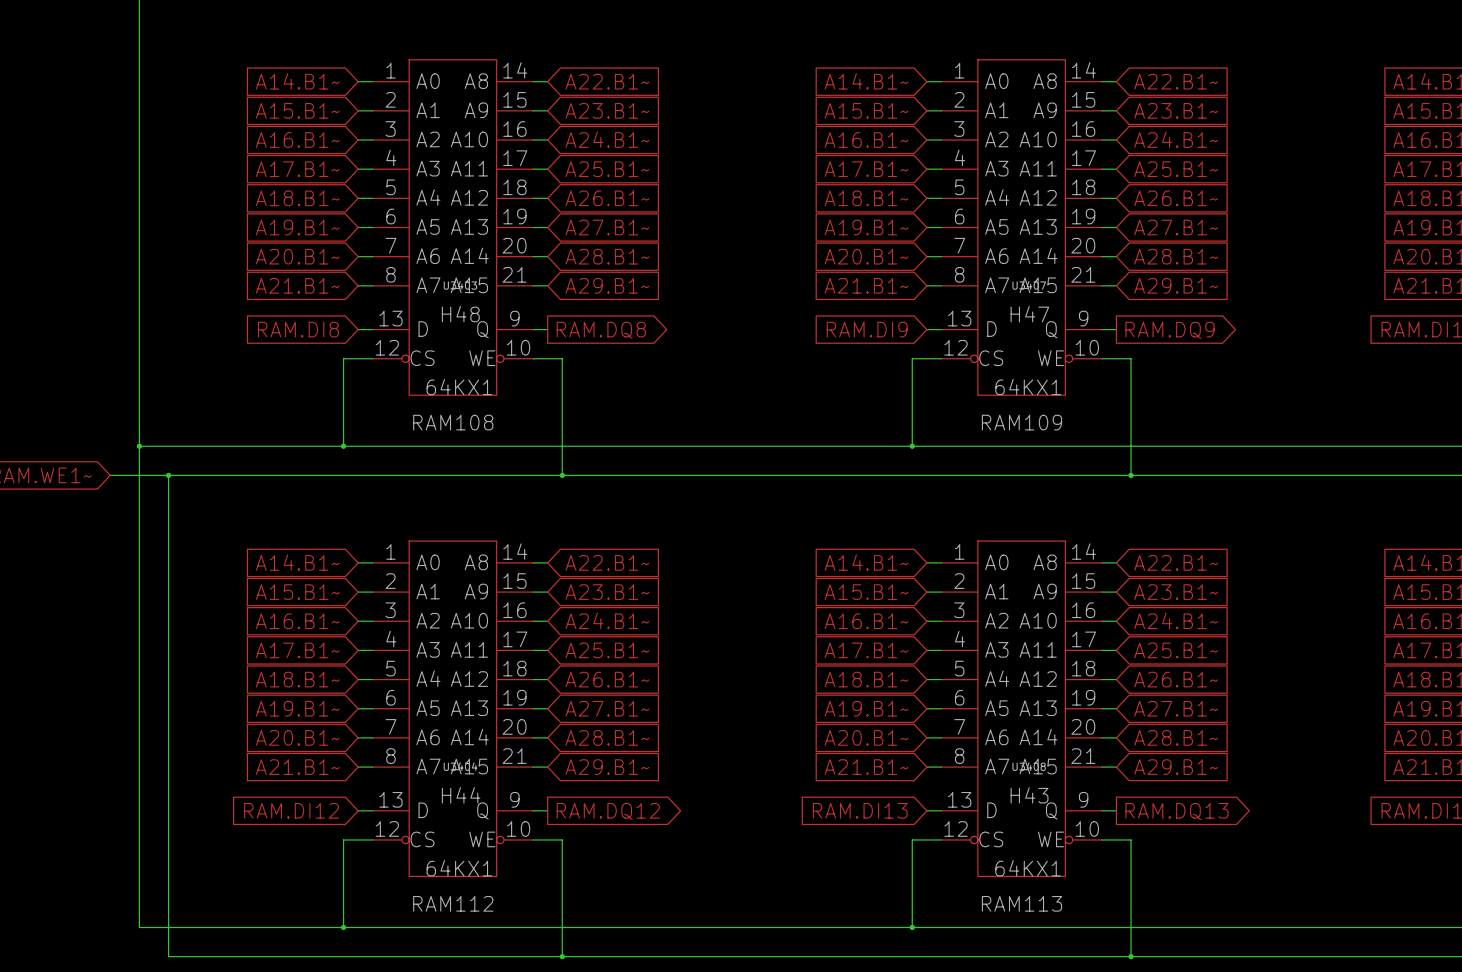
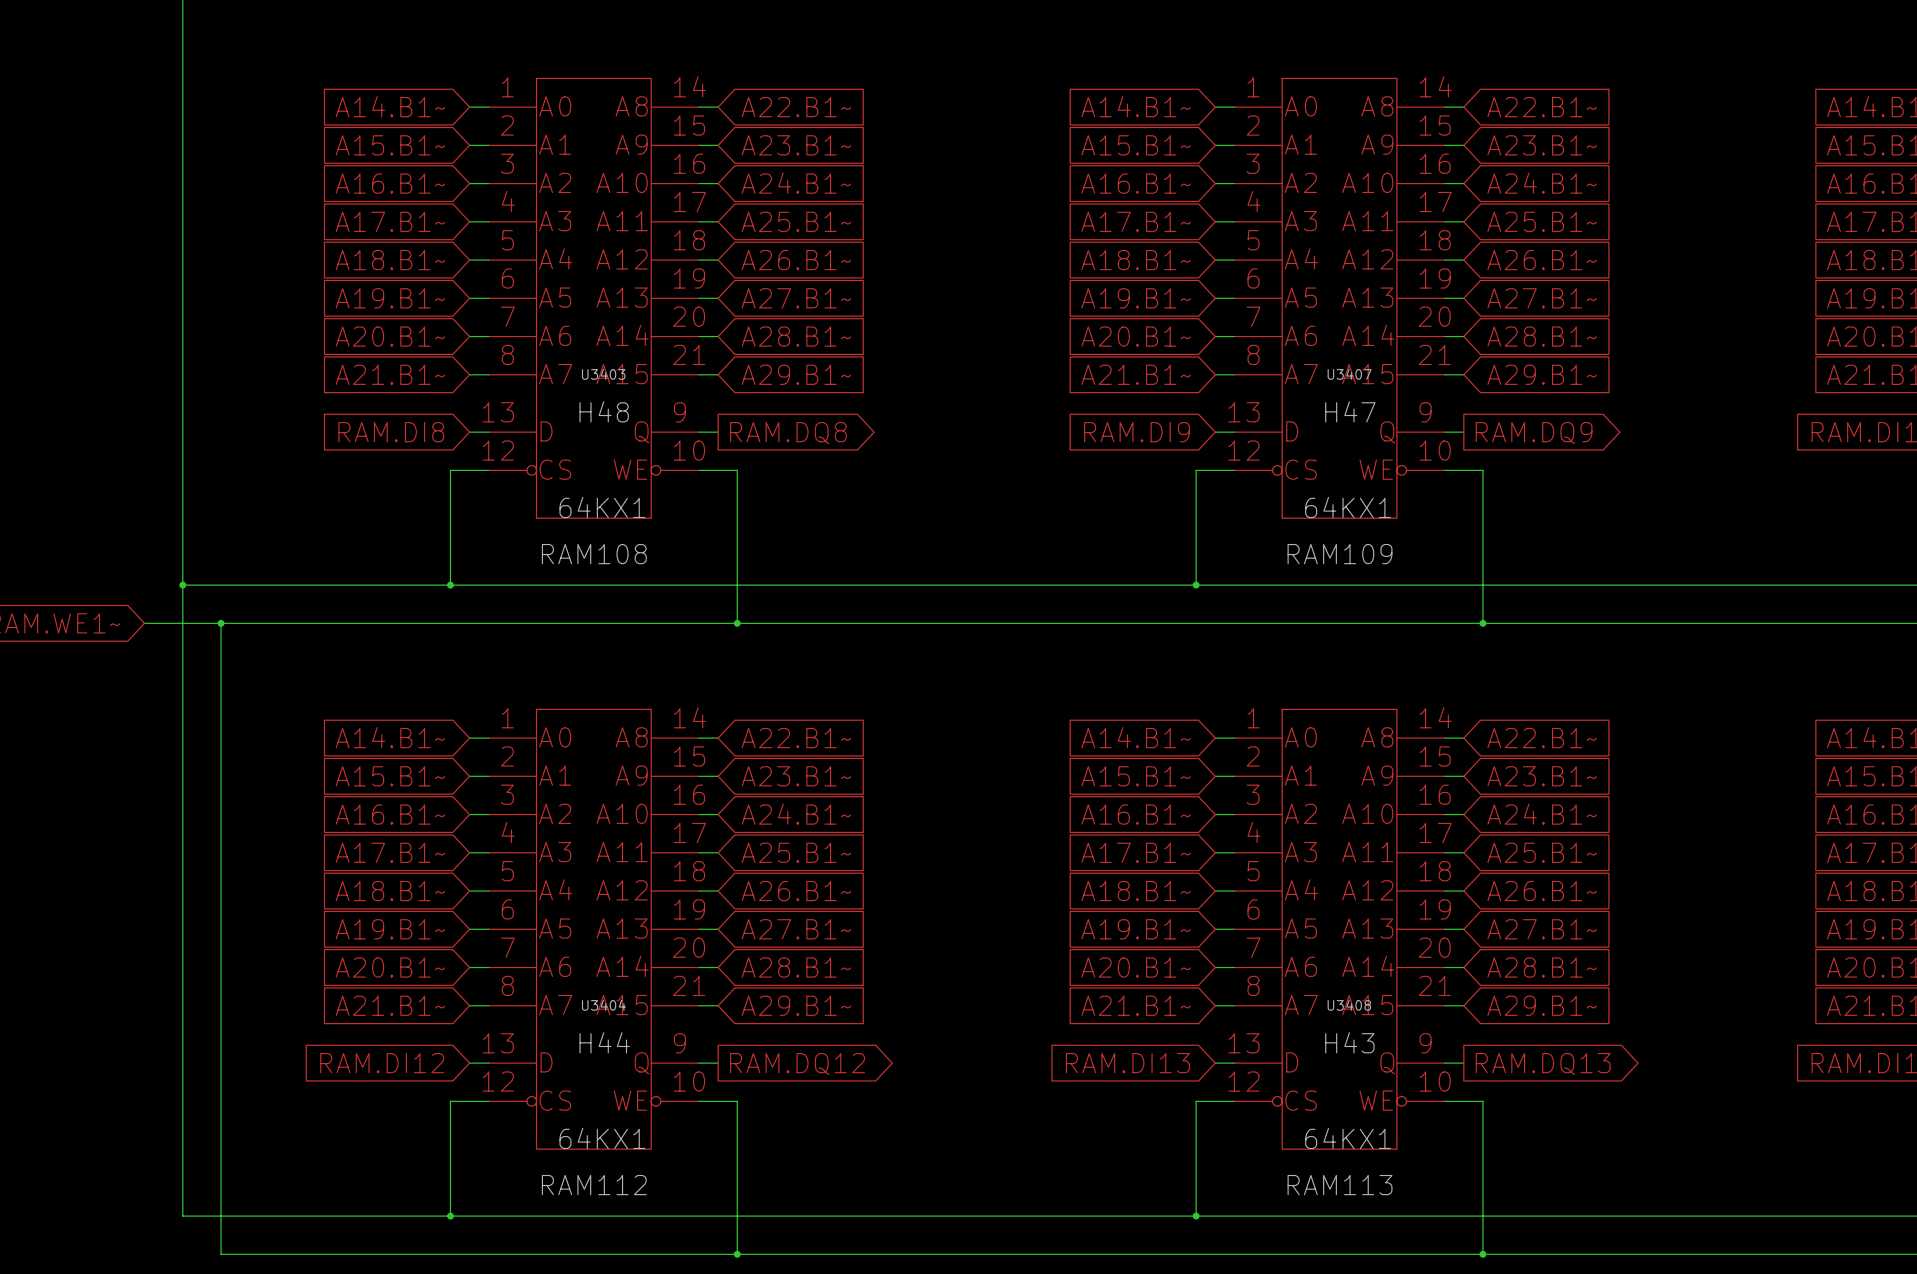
U3403 symbol: [372, 59, 534, 396] -> [488, 78, 700, 519]
U3407 symbol: [941, 59, 1102, 396] -> [1234, 78, 1445, 519]
U3404 symbol: [372, 541, 534, 877] -> [488, 709, 700, 1150]
U3408 symbol: [941, 541, 1102, 877] -> [1234, 709, 1445, 1150]

